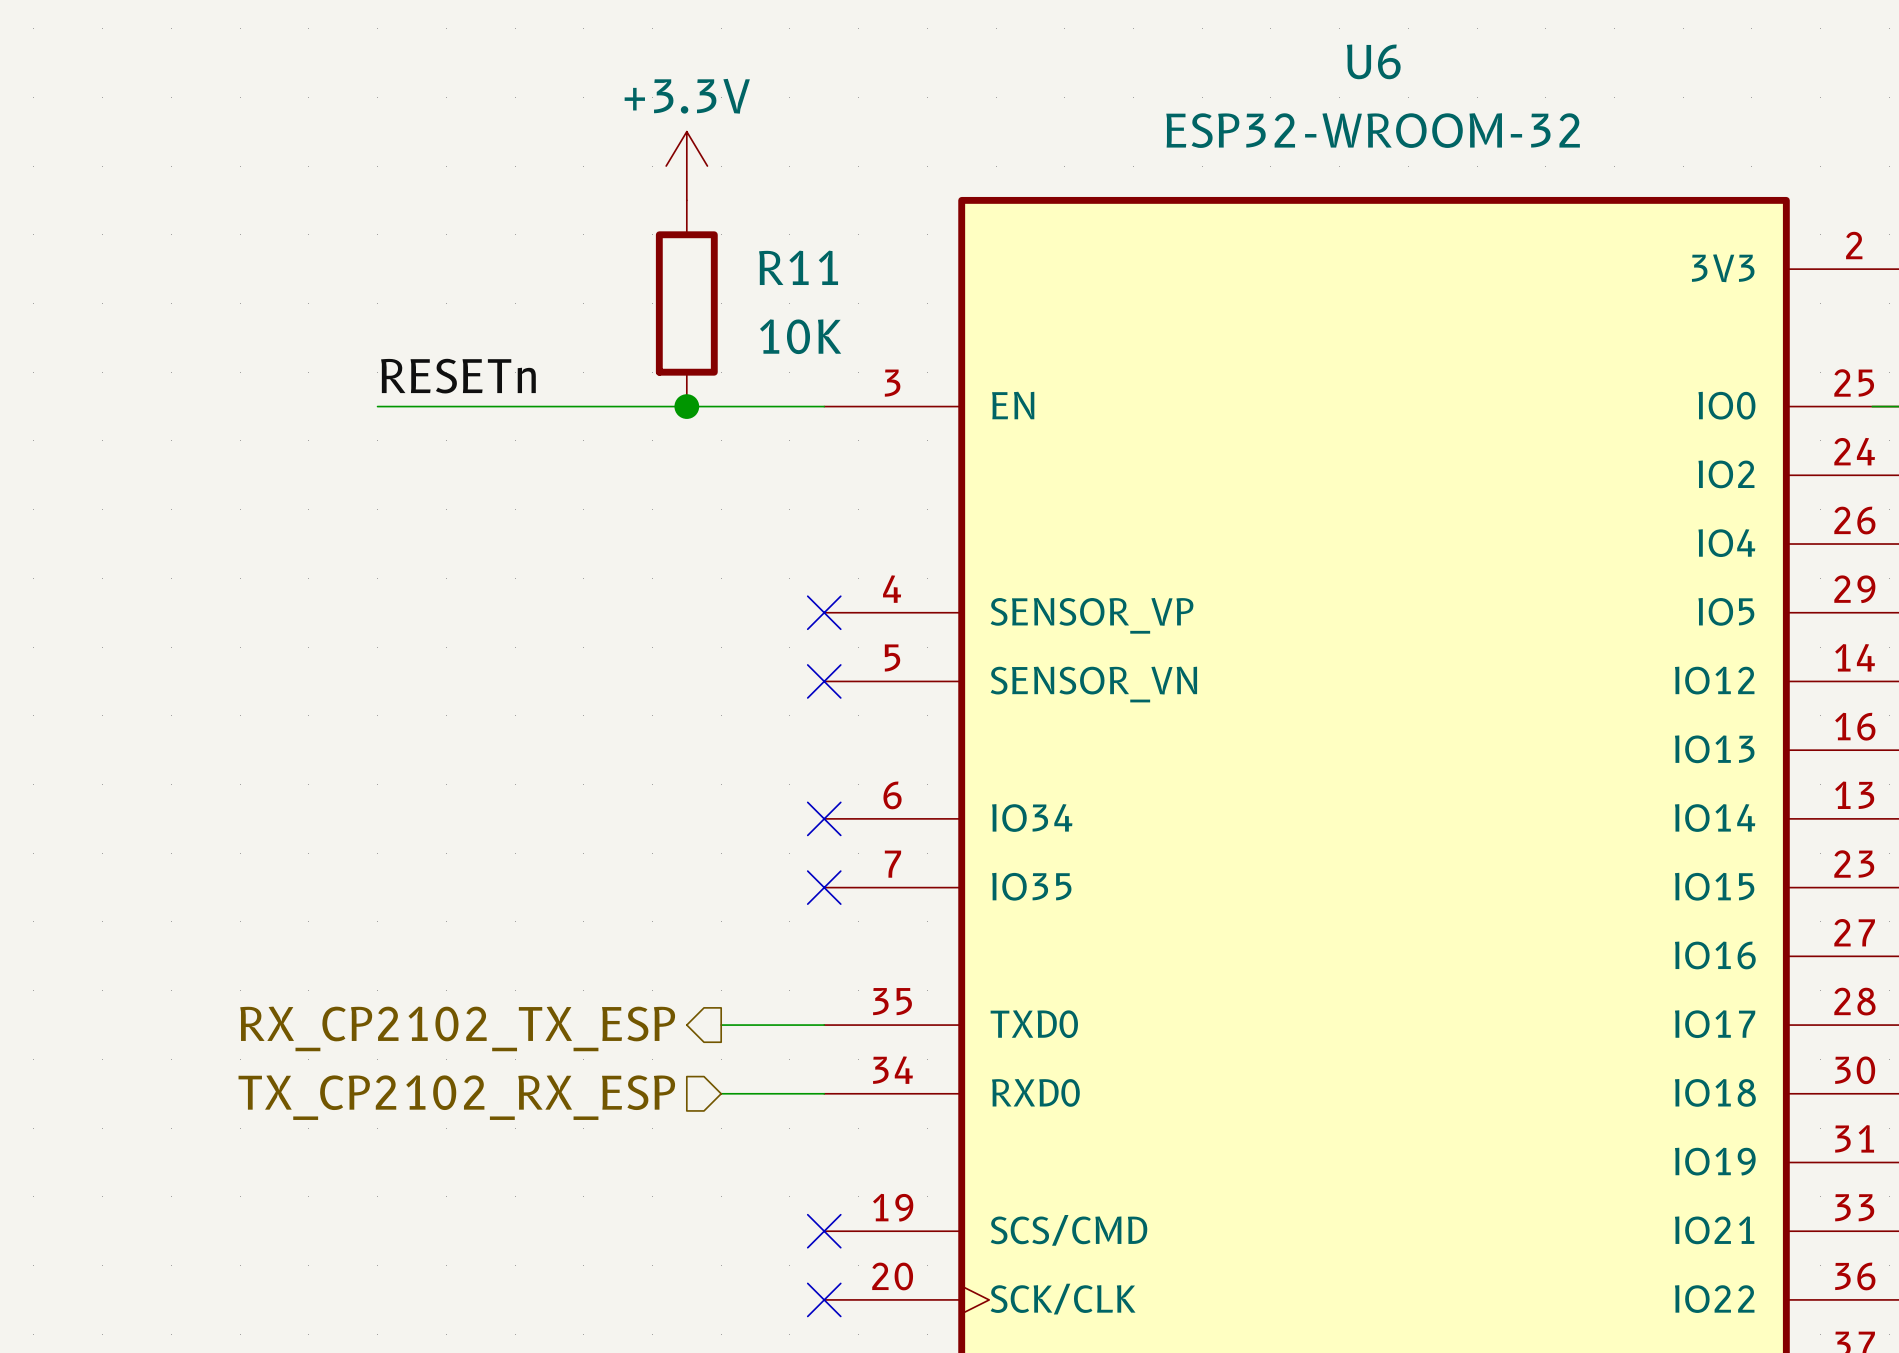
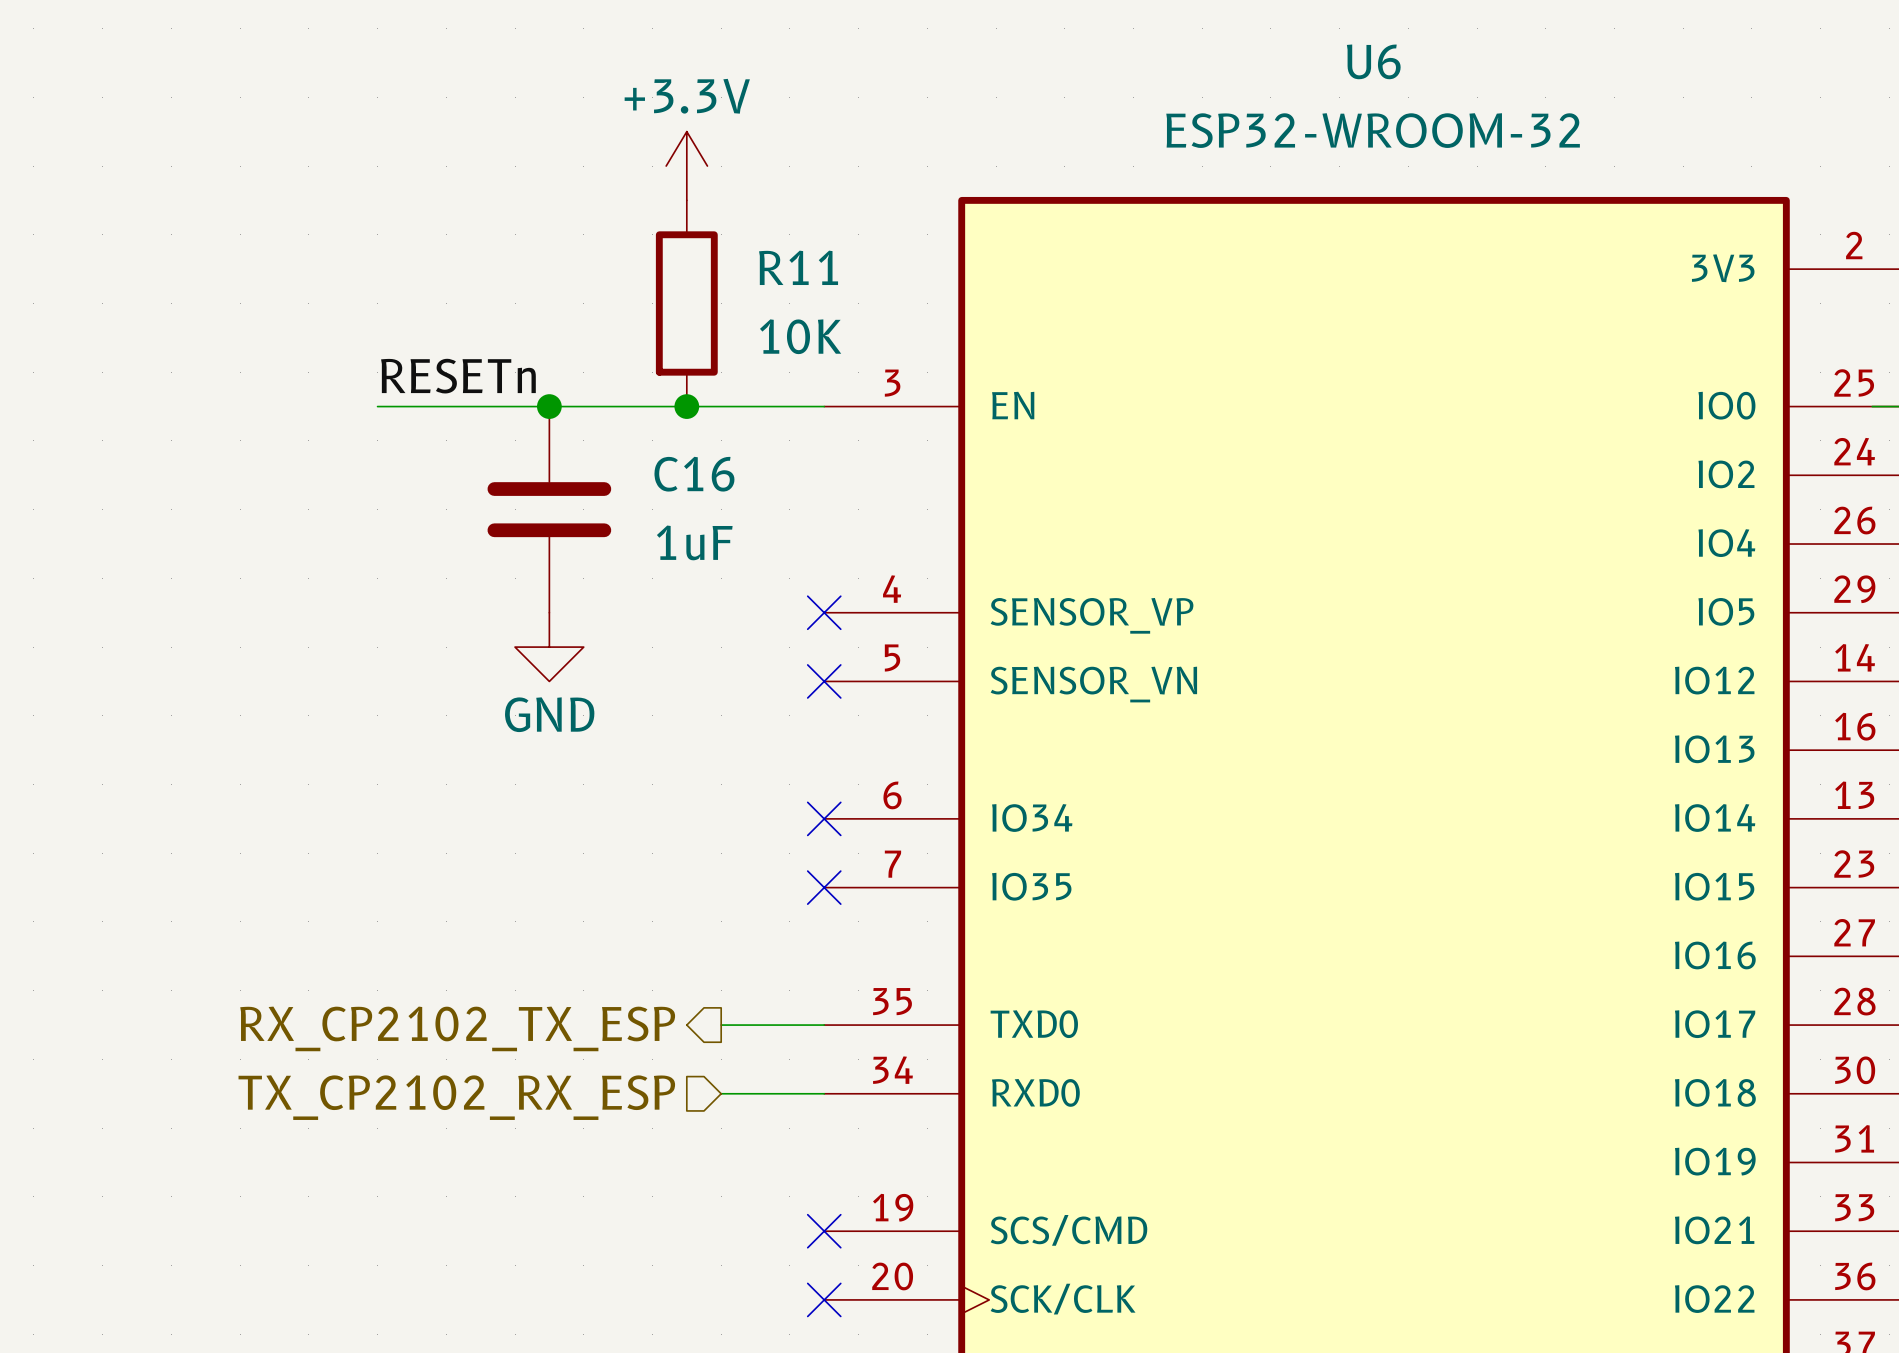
junction: none -> (549, 406)
C16: none -> 1uF (549, 509)
power symbol: none -> GND (549, 647)

